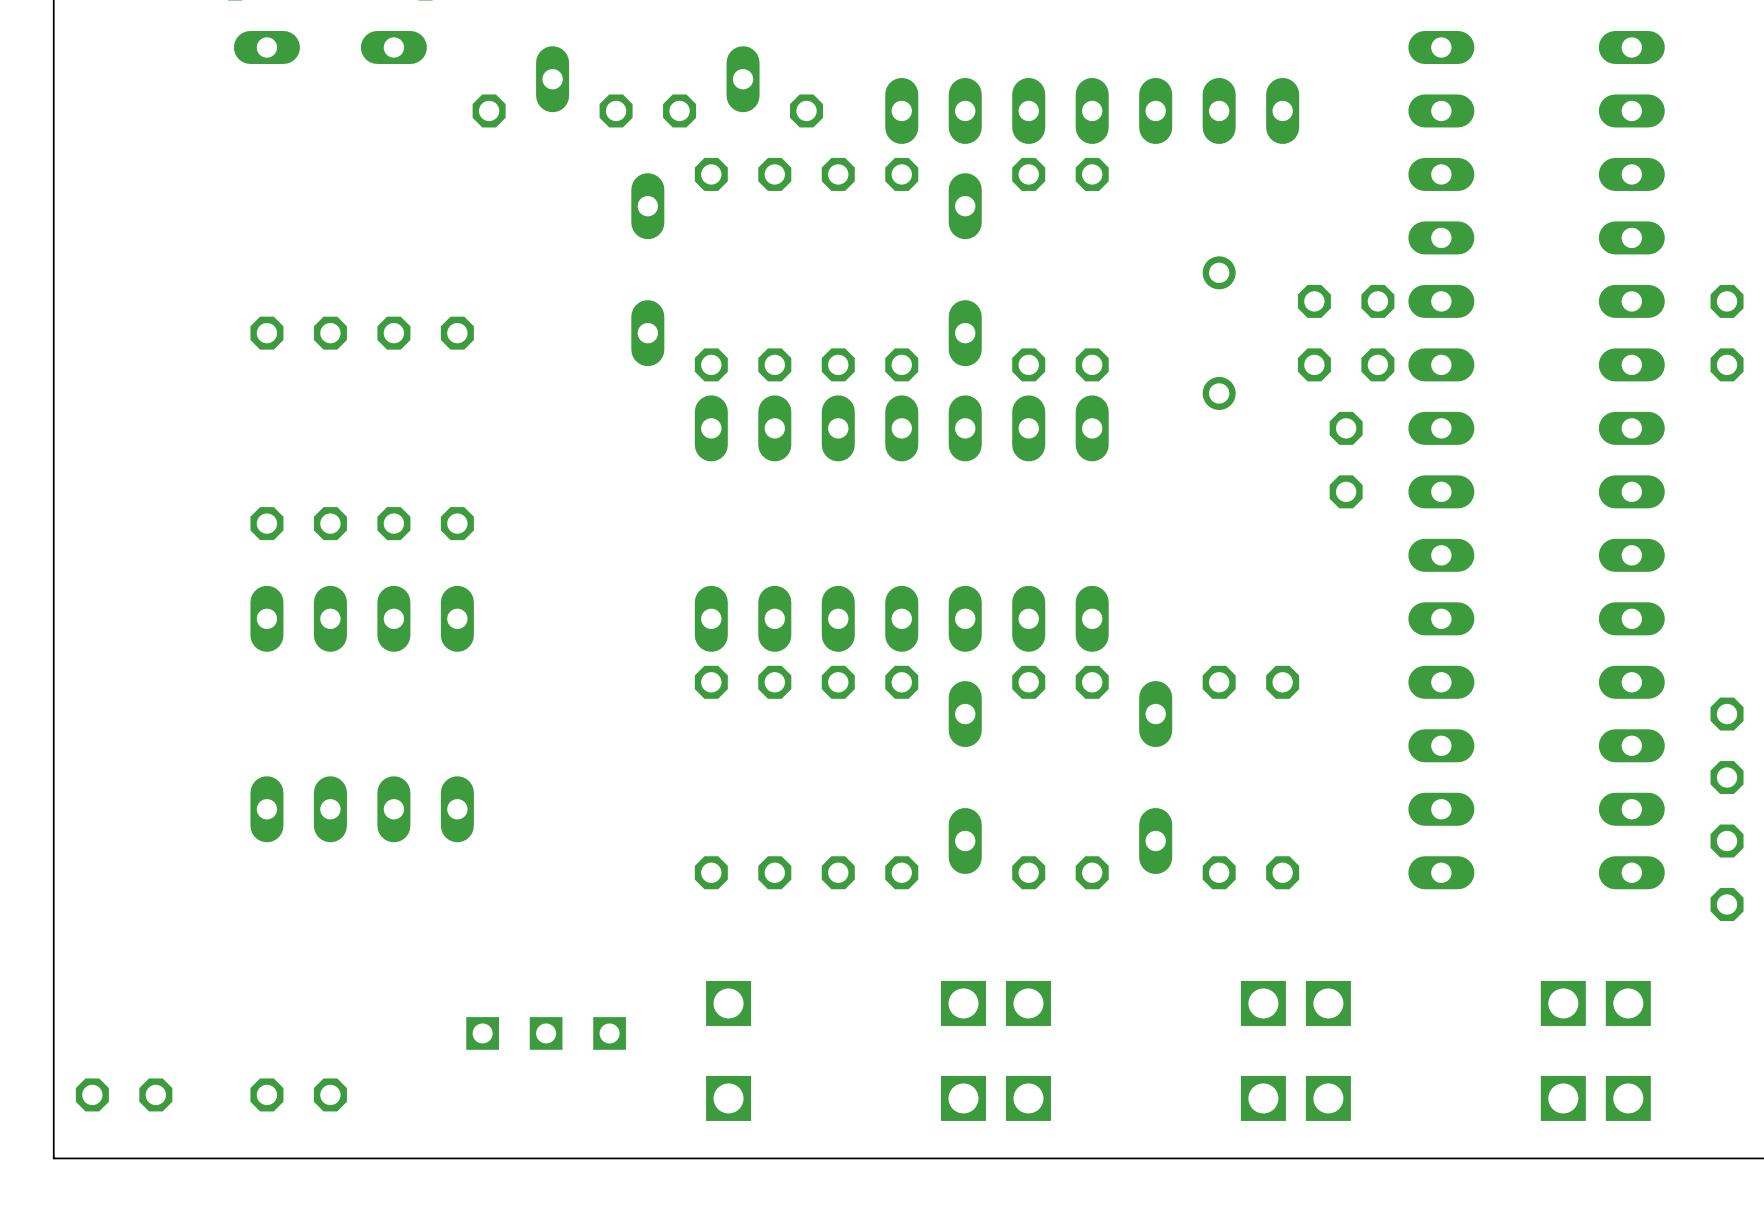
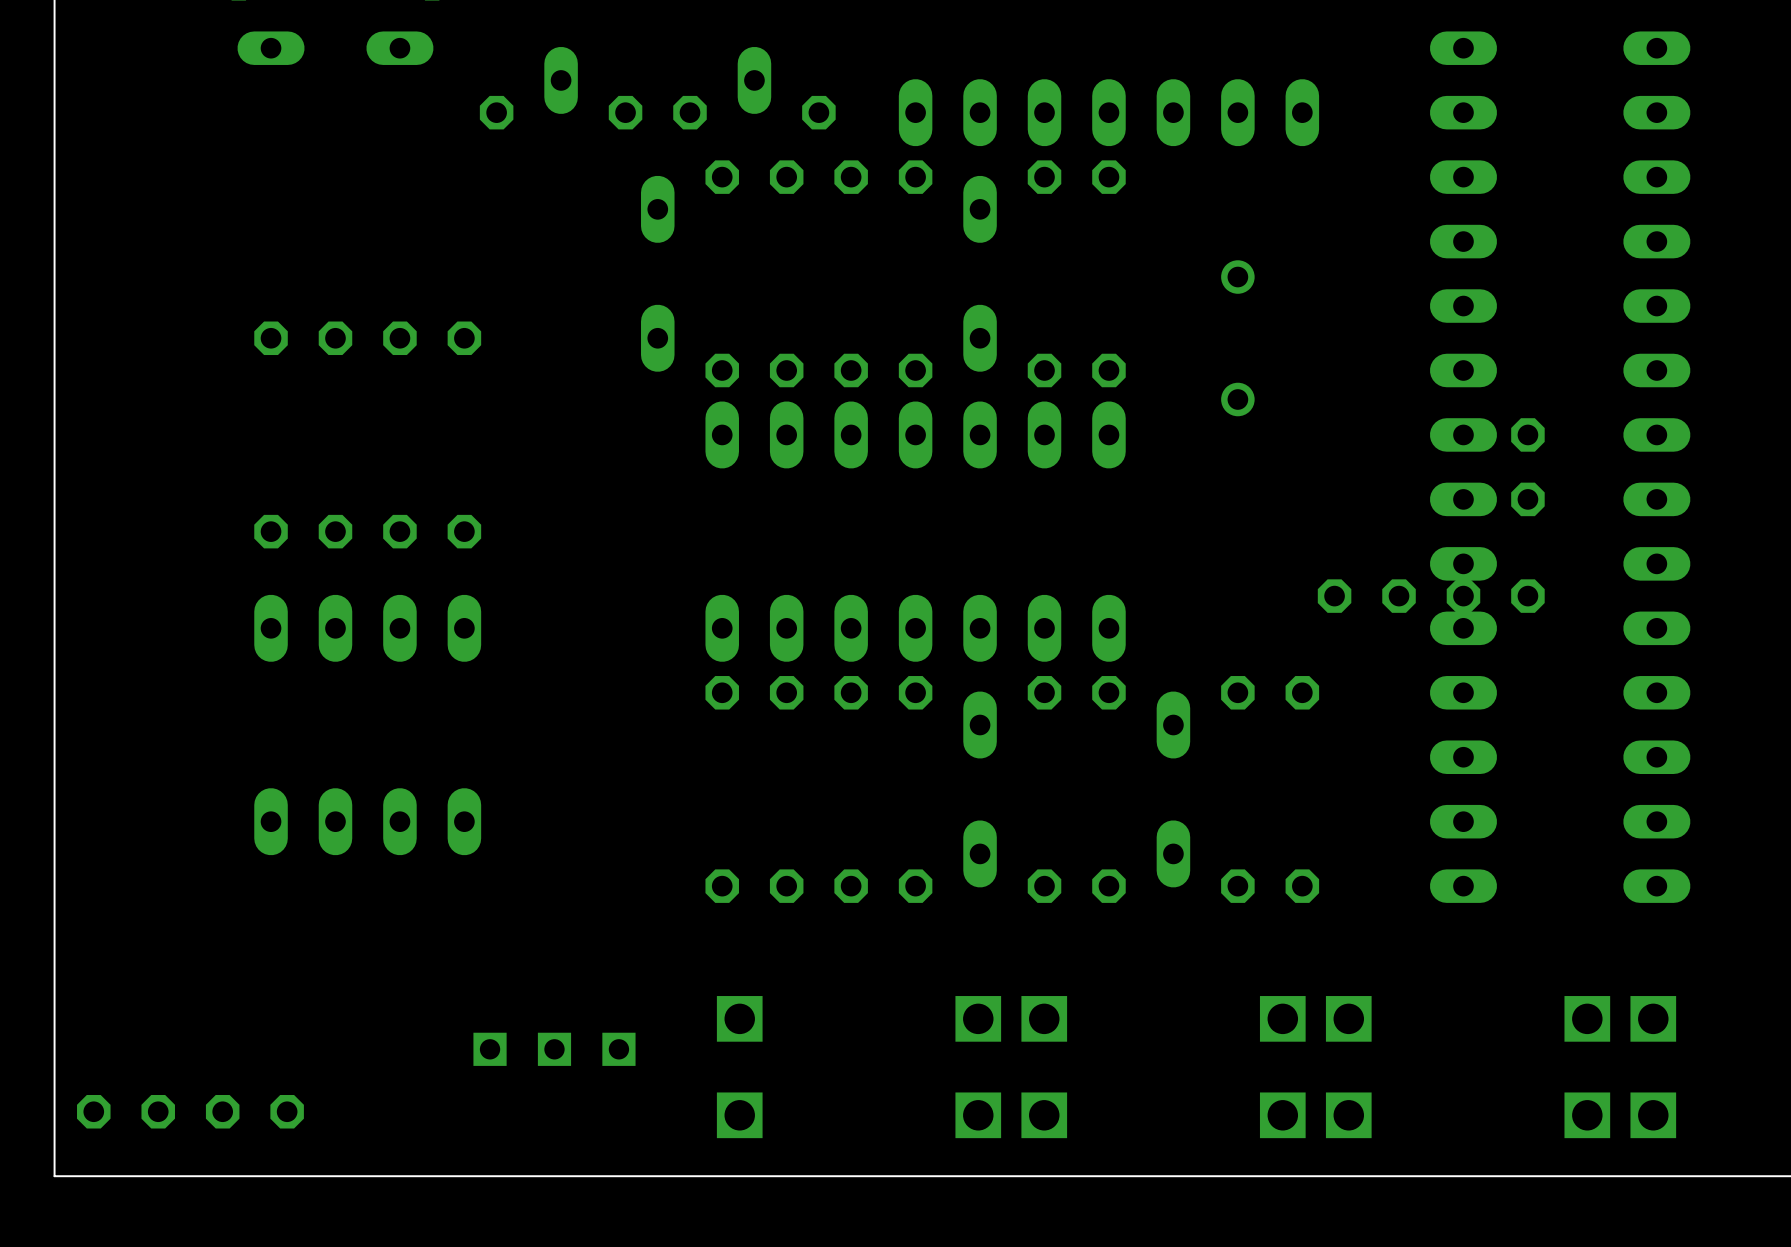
part: (1346, 301) -> none
part: (1727, 333) -> none
part: (1346, 364) -> none
part: (1346, 460) -> none
part: none -> (1527, 467)
part: none -> (1366, 596)
part: none -> (1495, 596)
part: (1727, 745) -> none
part: (1727, 872) -> none
part position: (298, 1094) -> (254, 1111)

